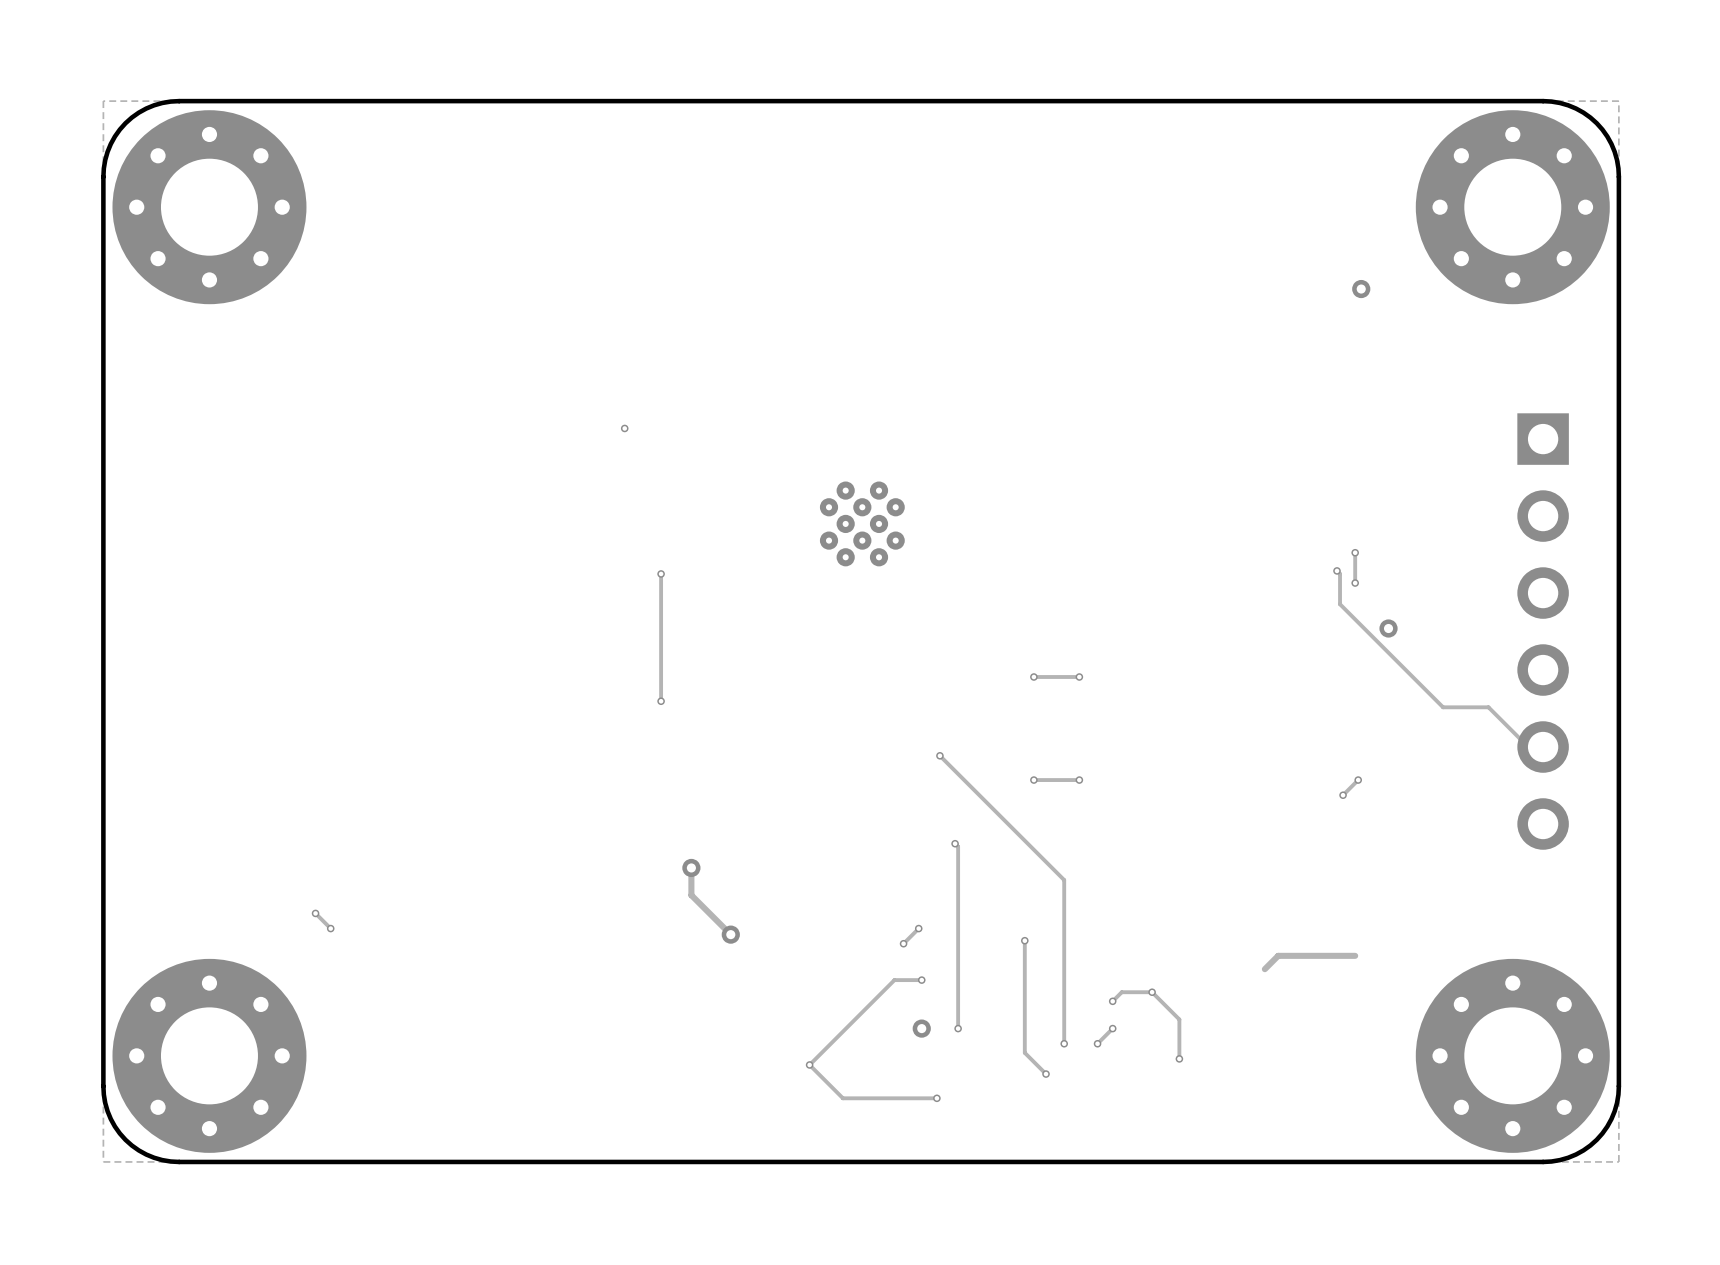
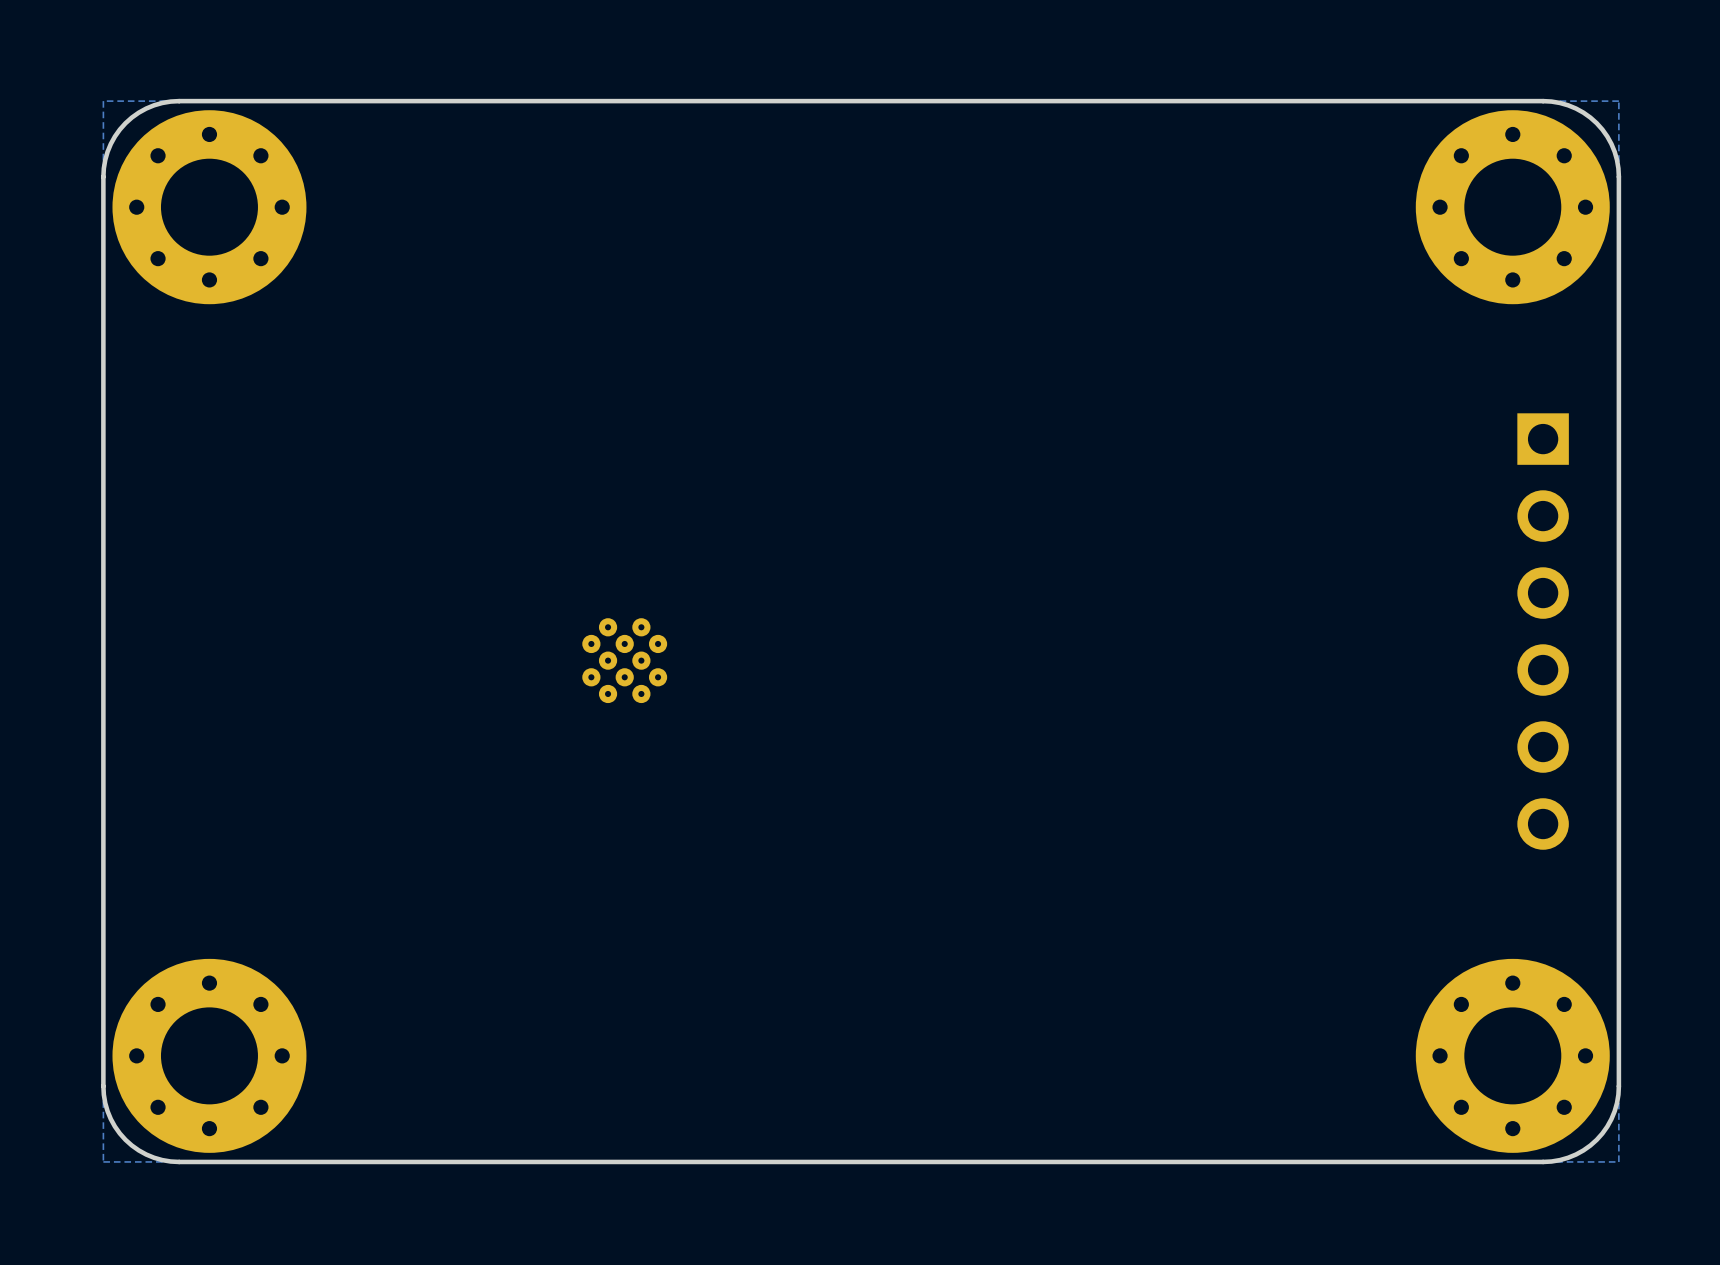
via: (1361, 289) -> none
via: (624, 428) -> none
part position: (862, 523) -> (624, 660)
track: (1355, 552) (1355, 583) -> none
via: (1355, 552) -> none
track: (1337, 570) (1340, 573) (1340, 604) (1443, 707) (1488, 707) (1527, 746) (1543, 746) -> none
via: (1337, 570) -> none
track: (661, 573) (661, 701) -> none
via: (661, 573) -> none
via: (1355, 583) -> none
via: (1388, 628) -> none
via: (1033, 677) -> none
track: (1079, 677) (1033, 677) -> none
via: (1079, 677) -> none
via: (661, 701) -> none
track: (939, 755) (1064, 880) (1064, 1043) -> none
via: (939, 755) -> none
via: (1033, 780) -> none
track: (1079, 780) (1033, 780) -> none
via: (1079, 780) -> none
track: (1358, 780) (1343, 795) -> none
via: (1358, 780) -> none
via: (1343, 795) -> none
track: (955, 843) (958, 846) (958, 1028) -> none
via: (955, 843) -> none
track: (691, 867) (691, 895) (730, 934) -> none
via: (691, 867) -> none
track: (315, 913) (330, 928) -> none
via: (315, 913) -> none
via: (330, 928) -> none
track: (918, 928) (903, 943) -> none
via: (918, 928) -> none
via: (730, 934) -> none
track: (1024, 940) (1024, 1052) (1046, 1074) -> none
via: (1024, 940) -> none
via: (903, 943) -> none
track: (1355, 955) (1278, 955) (1264, 969) -> none
track: (921, 980) (894, 980) (809, 1064) (842, 1098) (936, 1098) -> none
via: (921, 980) -> none
via: (1152, 992) -> none
track: (1112, 1001) (1121, 992) (1152, 992) (1179, 1019) (1179, 1058) -> none
via: (1112, 1001) -> none
via: (921, 1028) -> none
via: (958, 1028) -> none
track: (1112, 1028) (1097, 1043) -> none
via: (1112, 1028) -> none
via: (1064, 1043) -> none
via: (1097, 1043) -> none
via: (1179, 1058) -> none
via: (809, 1064) -> none
via: (1046, 1074) -> none
via: (936, 1098) -> none

